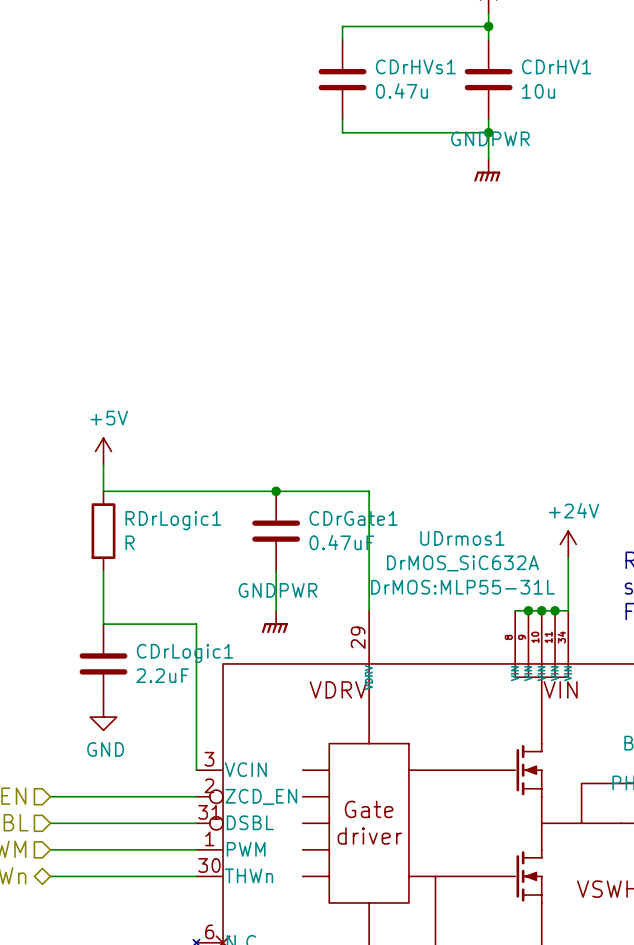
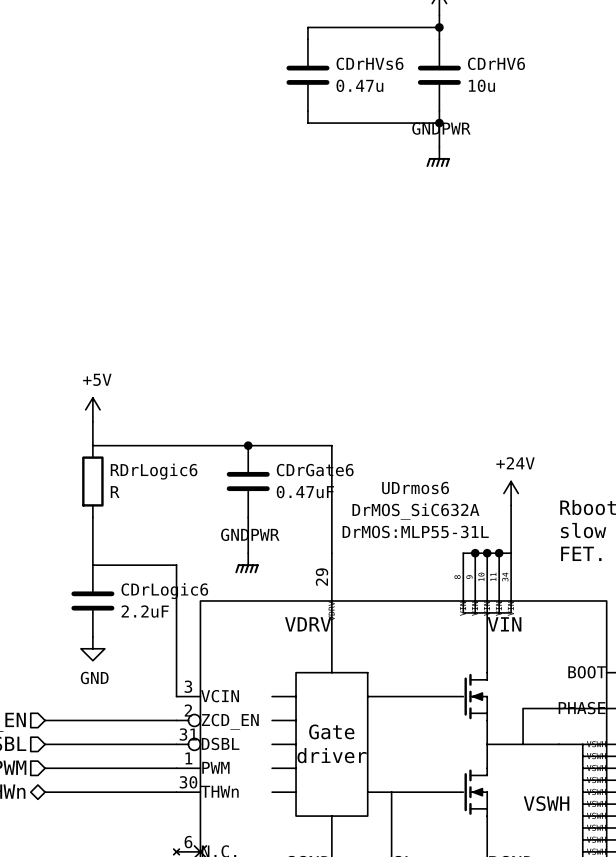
CDrHVs1 name: CDrHVs1 (415, 66) -> CDrHVs6 (370, 63)
CDrHV1 name: CDrHV1 (556, 66) -> CDrHV6 (496, 63)
CDrGate1 name: CDrGate1 (353, 518) -> CDrGate6 (315, 470)
RDrLogic1 name: RDrLogic1 (173, 520) -> RDrLogic6 (154, 471)
UDrmos1 name: UDrmos1 (462, 538) -> UDrmos6 (415, 488)
CDrLogic1 name: CDrLogic1 (185, 653) -> CDrLogic6 (164, 591)

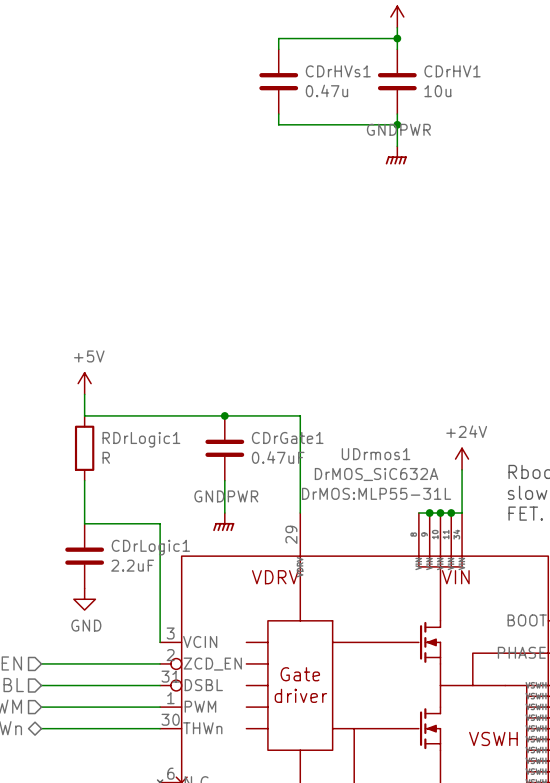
CDrHVs6 name: CDrHVs6 (370, 63) -> CDrHVs1 (338, 71)
CDrHV6 name: CDrHV6 (496, 63) -> CDrHV1 (452, 71)
CDrGate6 name: CDrGate6 (315, 470) -> CDrGate1 (287, 437)
RDrLogic6 name: RDrLogic6 (154, 471) -> RDrLogic1 (141, 439)
UDrmos6 name: UDrmos6 (415, 488) -> UDrmos1 (376, 454)
CDrLogic6 name: CDrLogic6 (164, 591) -> CDrLogic1 (150, 547)

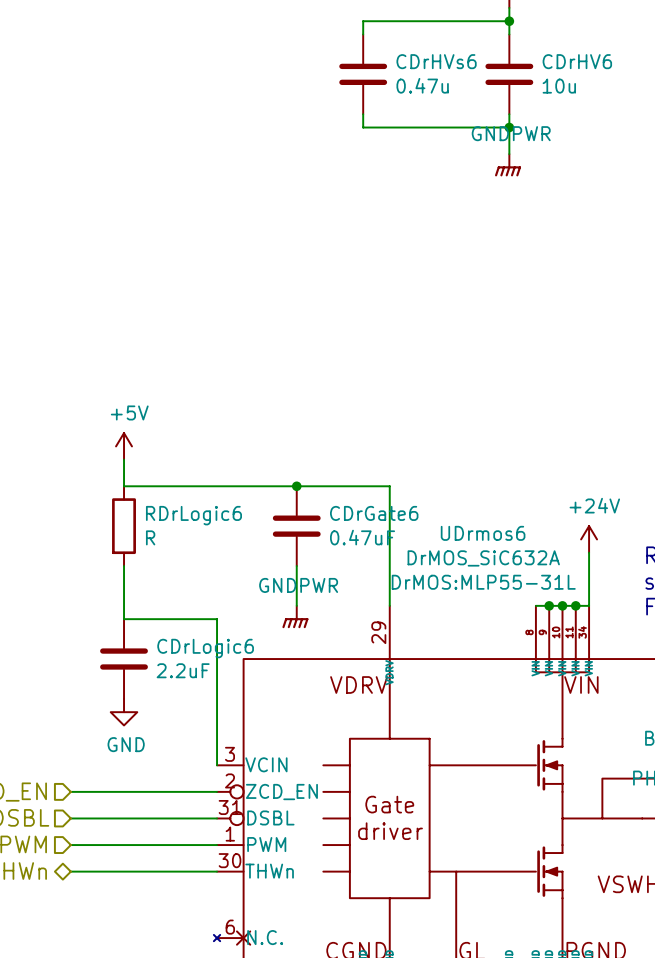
CDrHVs1 name: CDrHVs1 (338, 71) -> CDrHVs6 (436, 61)
CDrHV1 name: CDrHV1 (452, 71) -> CDrHV6 (577, 61)
CDrGate1 name: CDrGate1 (287, 437) -> CDrGate6 (374, 513)
RDrLogic1 name: RDrLogic1 (141, 439) -> RDrLogic6 (193, 515)
UDrmos1 name: UDrmos1 (376, 454) -> UDrmos6 (483, 533)
CDrLogic1 name: CDrLogic1 (150, 547) -> CDrLogic6 (205, 648)

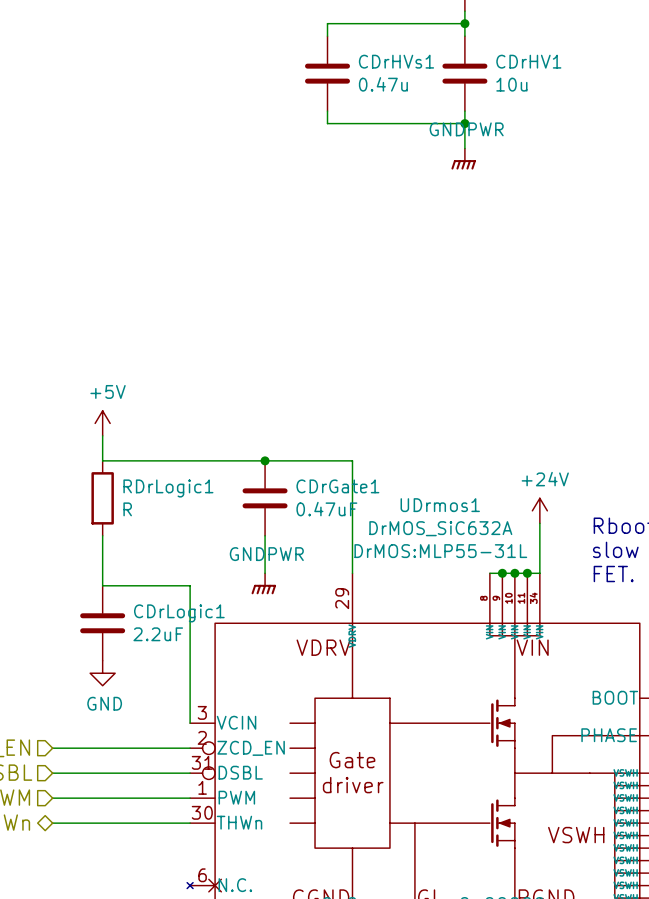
CDrHVs6 name: CDrHVs6 (436, 61) -> CDrHVs1 (396, 61)
CDrHV6 name: CDrHV6 (577, 61) -> CDrHV1 (528, 61)
CDrGate6 name: CDrGate6 (374, 513) -> CDrGate1 (337, 486)
RDrLogic6 name: RDrLogic6 (193, 515) -> RDrLogic1 (168, 488)
UDrmos6 name: UDrmos6 (483, 533) -> UDrmos1 (440, 505)
CDrLogic6 name: CDrLogic6 (205, 648) -> CDrLogic1 (179, 613)

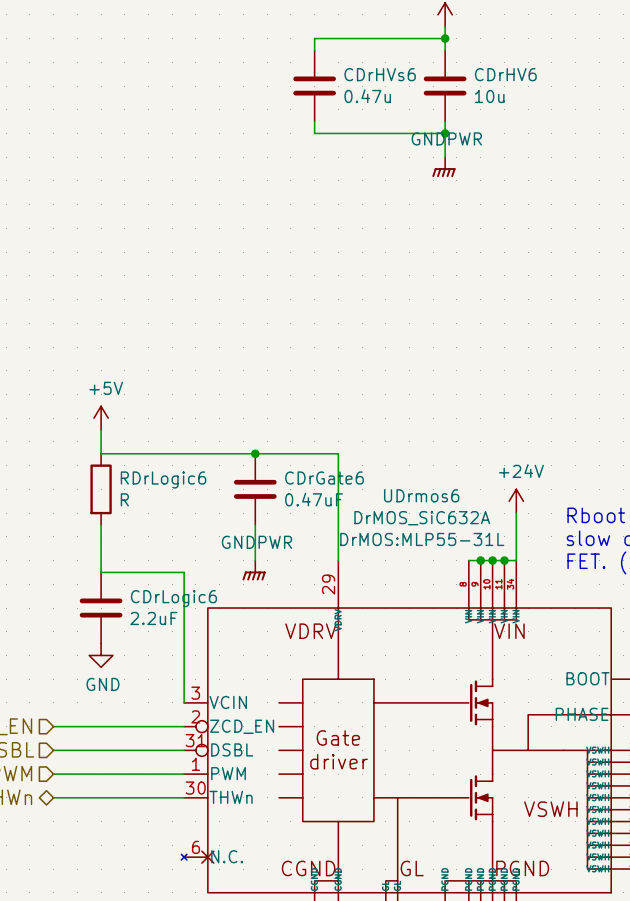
CDrHVs1 name: CDrHVs1 (396, 61) -> CDrHVs6 (380, 74)
CDrHV1 name: CDrHV1 (528, 61) -> CDrHV6 (505, 74)
CDrGate1 name: CDrGate1 (337, 486) -> CDrGate6 (324, 478)
RDrLogic1 name: RDrLogic1 (168, 488) -> RDrLogic6 (163, 479)
UDrmos1 name: UDrmos1 (440, 505) -> UDrmos6 (421, 495)
CDrLogic1 name: CDrLogic1 (179, 613) -> CDrLogic6 (173, 598)

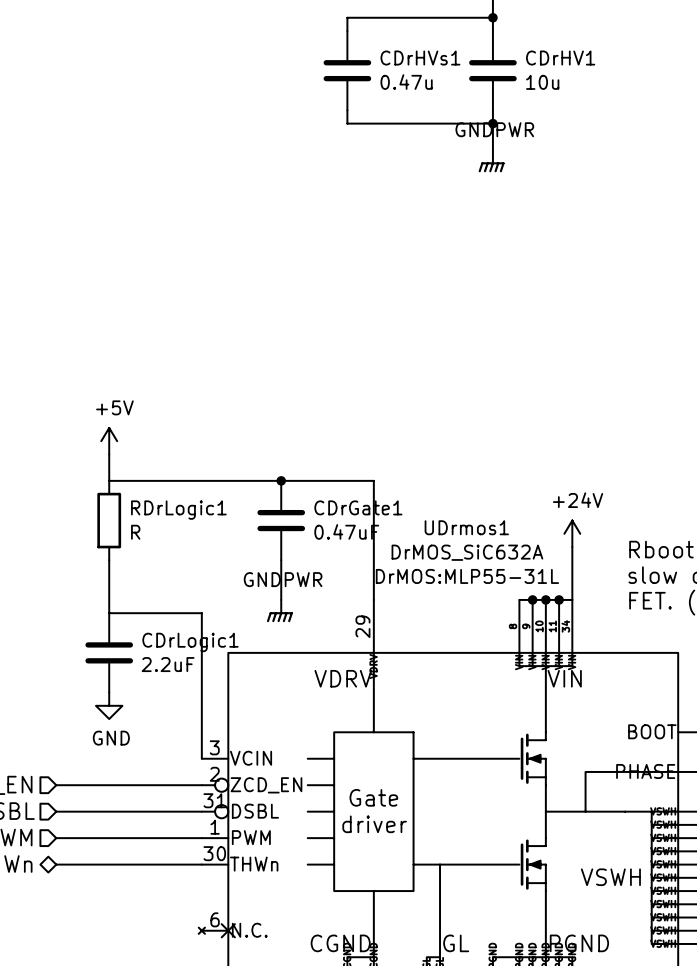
CDrHVs6 name: CDrHVs6 (380, 74) -> CDrHVs1 (420, 58)
CDrHV6 name: CDrHV6 (505, 74) -> CDrHV1 (560, 58)
CDrGate6 name: CDrGate6 (324, 478) -> CDrGate1 (358, 507)
RDrLogic6 name: RDrLogic6 (163, 479) -> RDrLogic1 (178, 510)
UDrmos6 name: UDrmos6 (421, 495) -> UDrmos1 (466, 527)
CDrLogic6 name: CDrLogic6 (173, 598) -> CDrLogic1 (190, 642)

